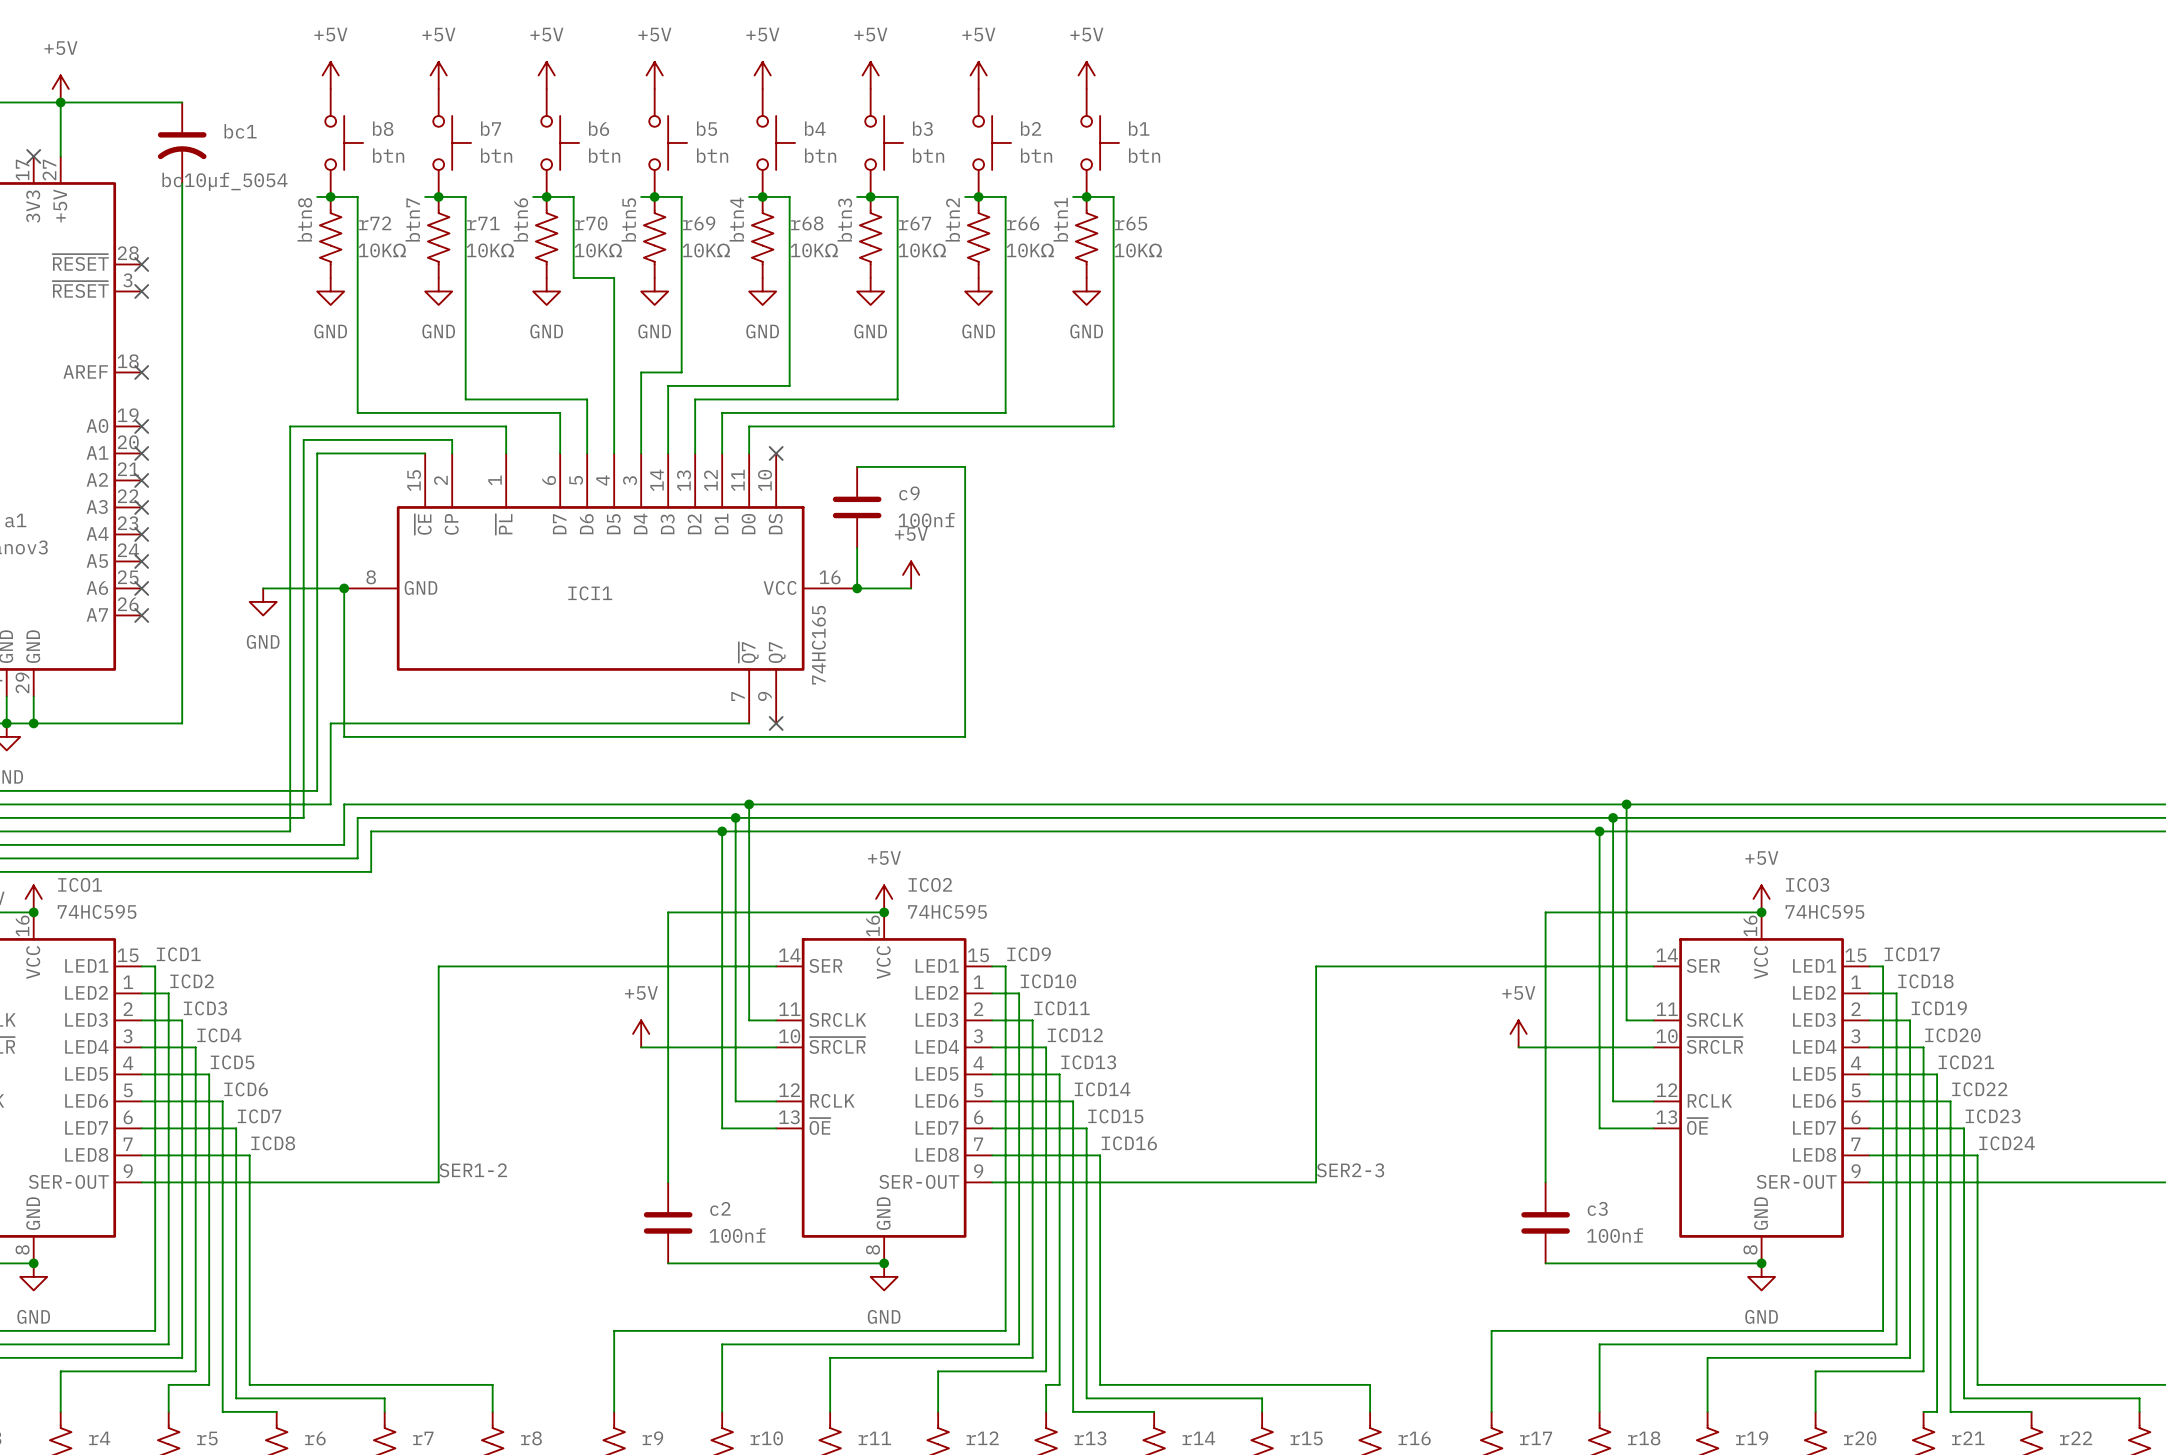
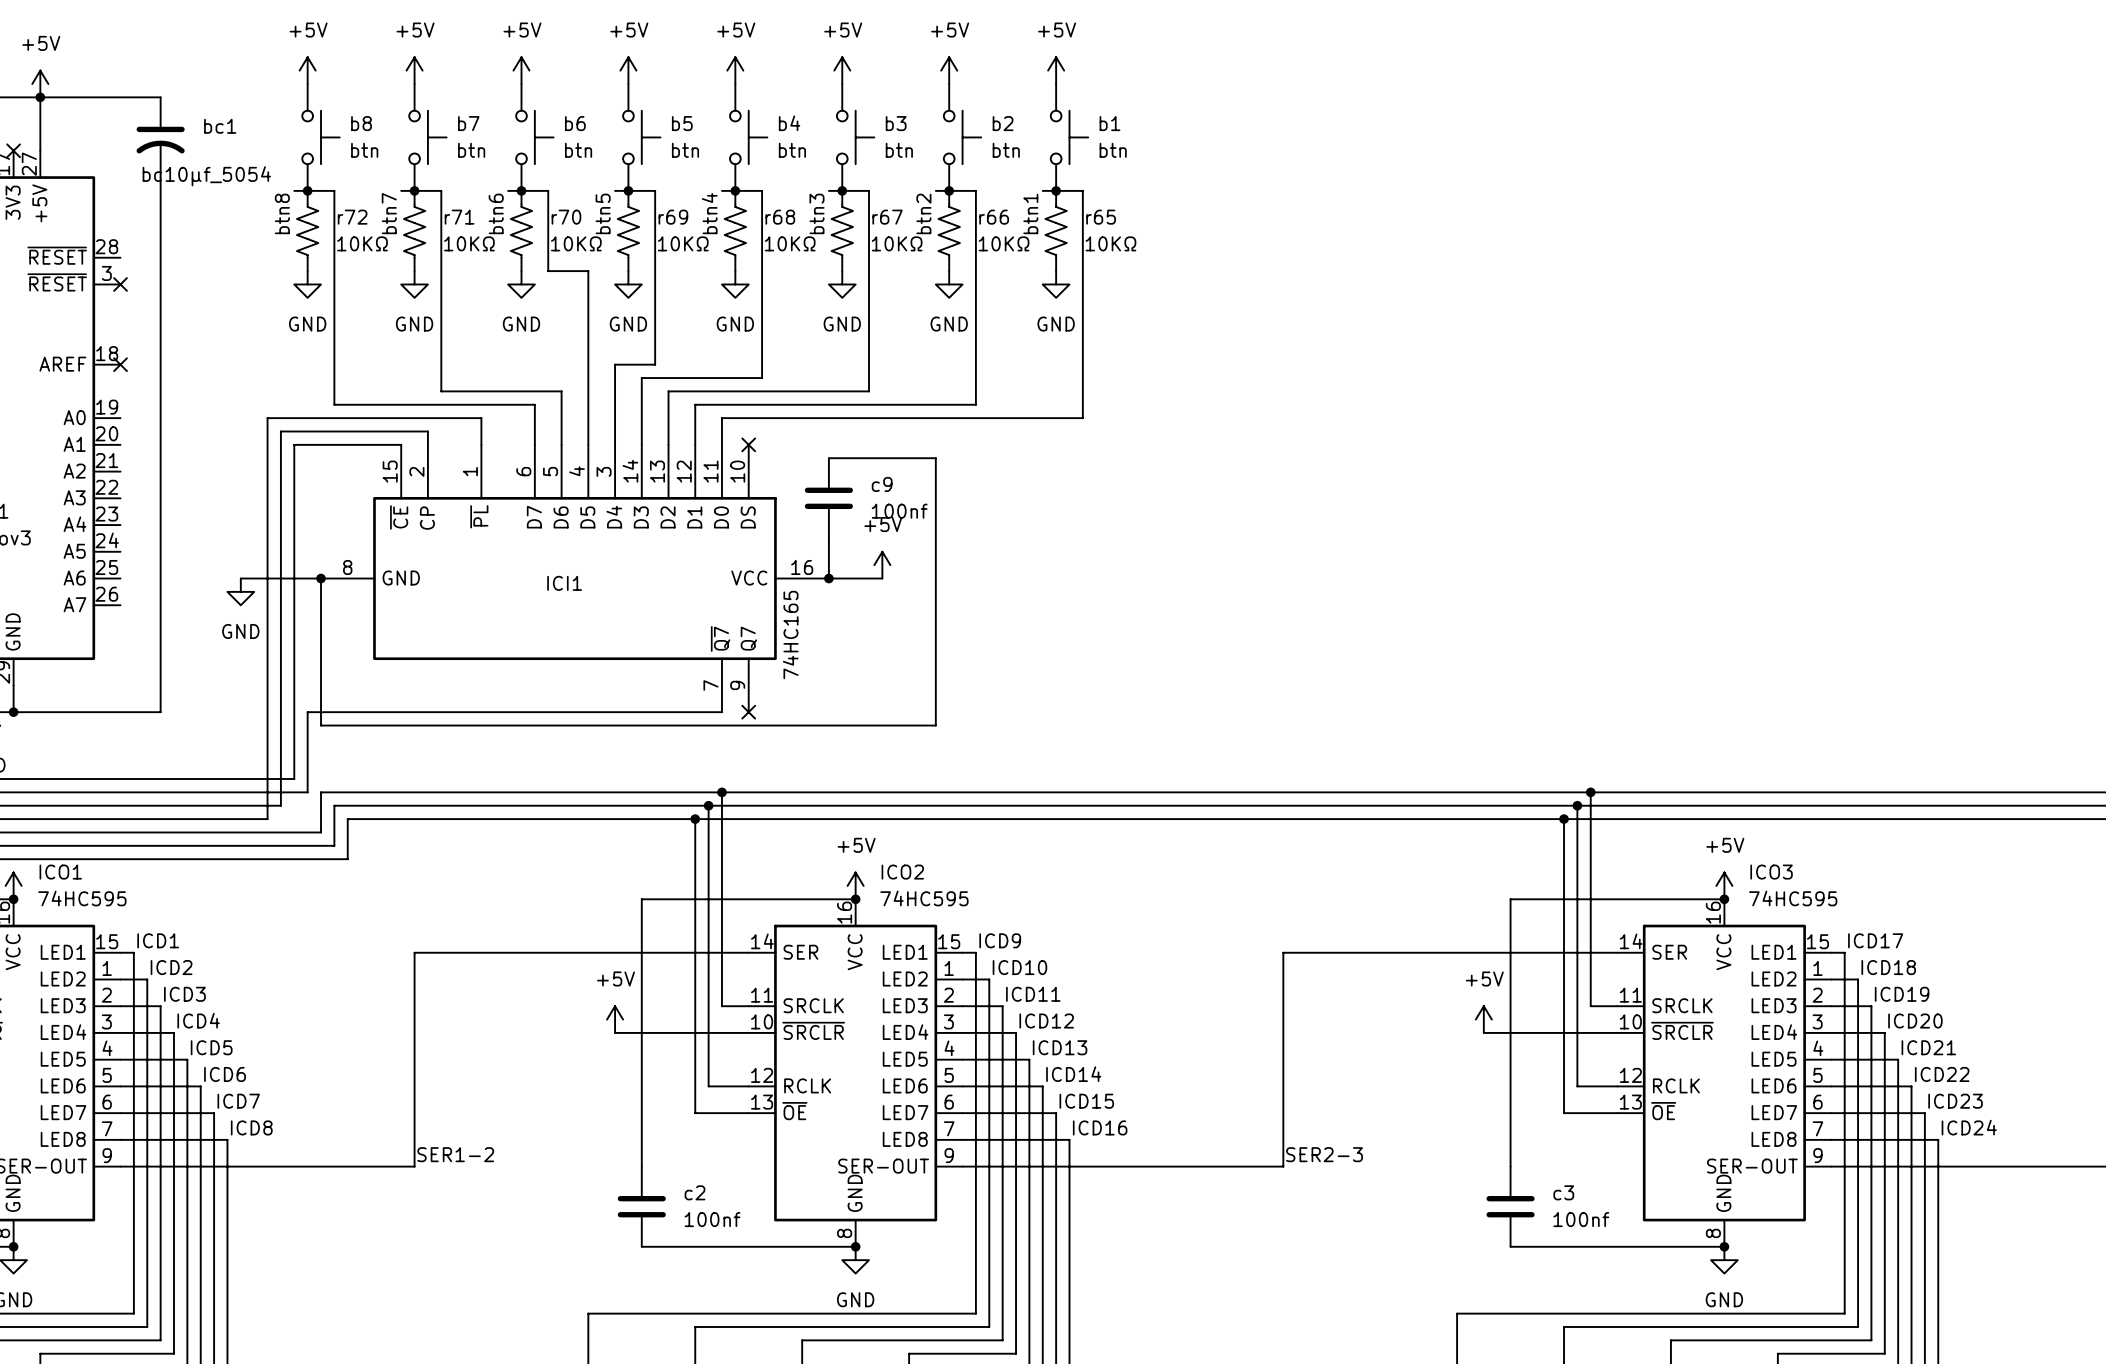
no-connect mark: (141, 264) -> none
no-connect mark: (141, 426) -> none
no-connect mark: (141, 453) -> none
no-connect mark: (141, 480) -> none
no-connect mark: (141, 507) -> none
no-connect mark: (141, 534) -> none
no-connect mark: (141, 561) -> none
no-connect mark: (141, 588) -> none
no-connect mark: (141, 615) -> none

